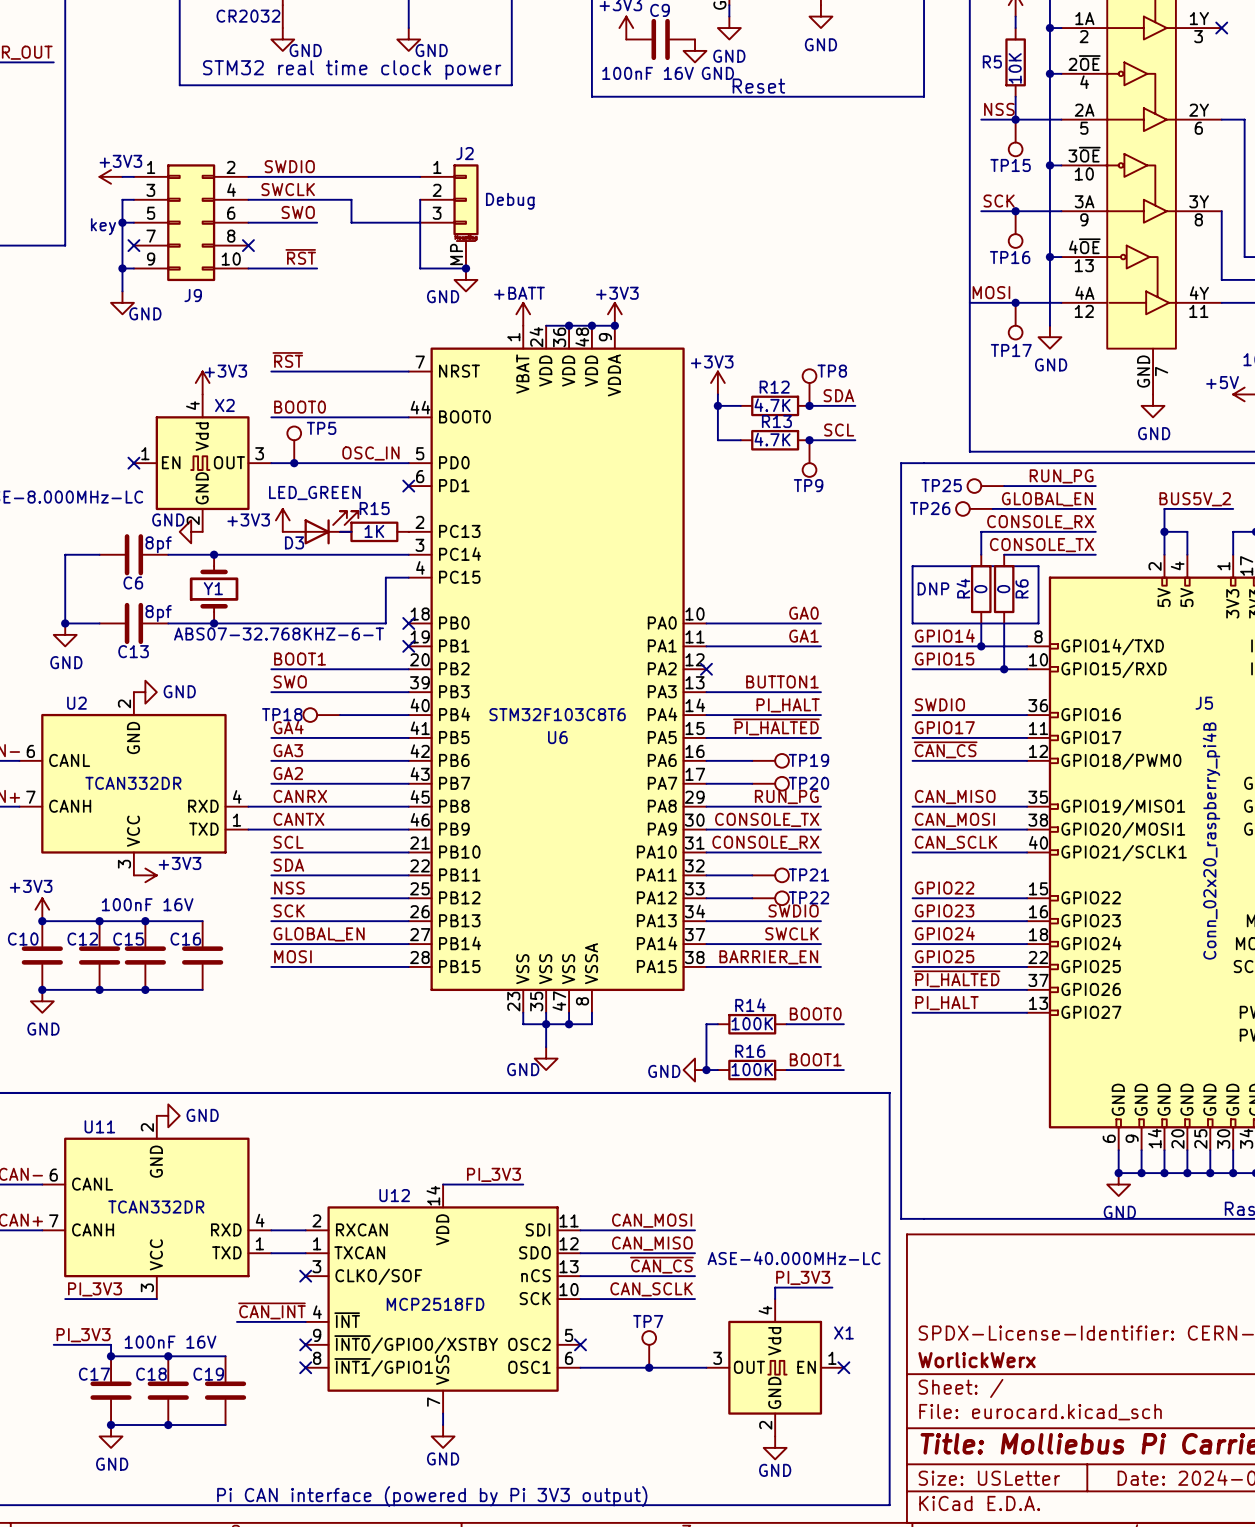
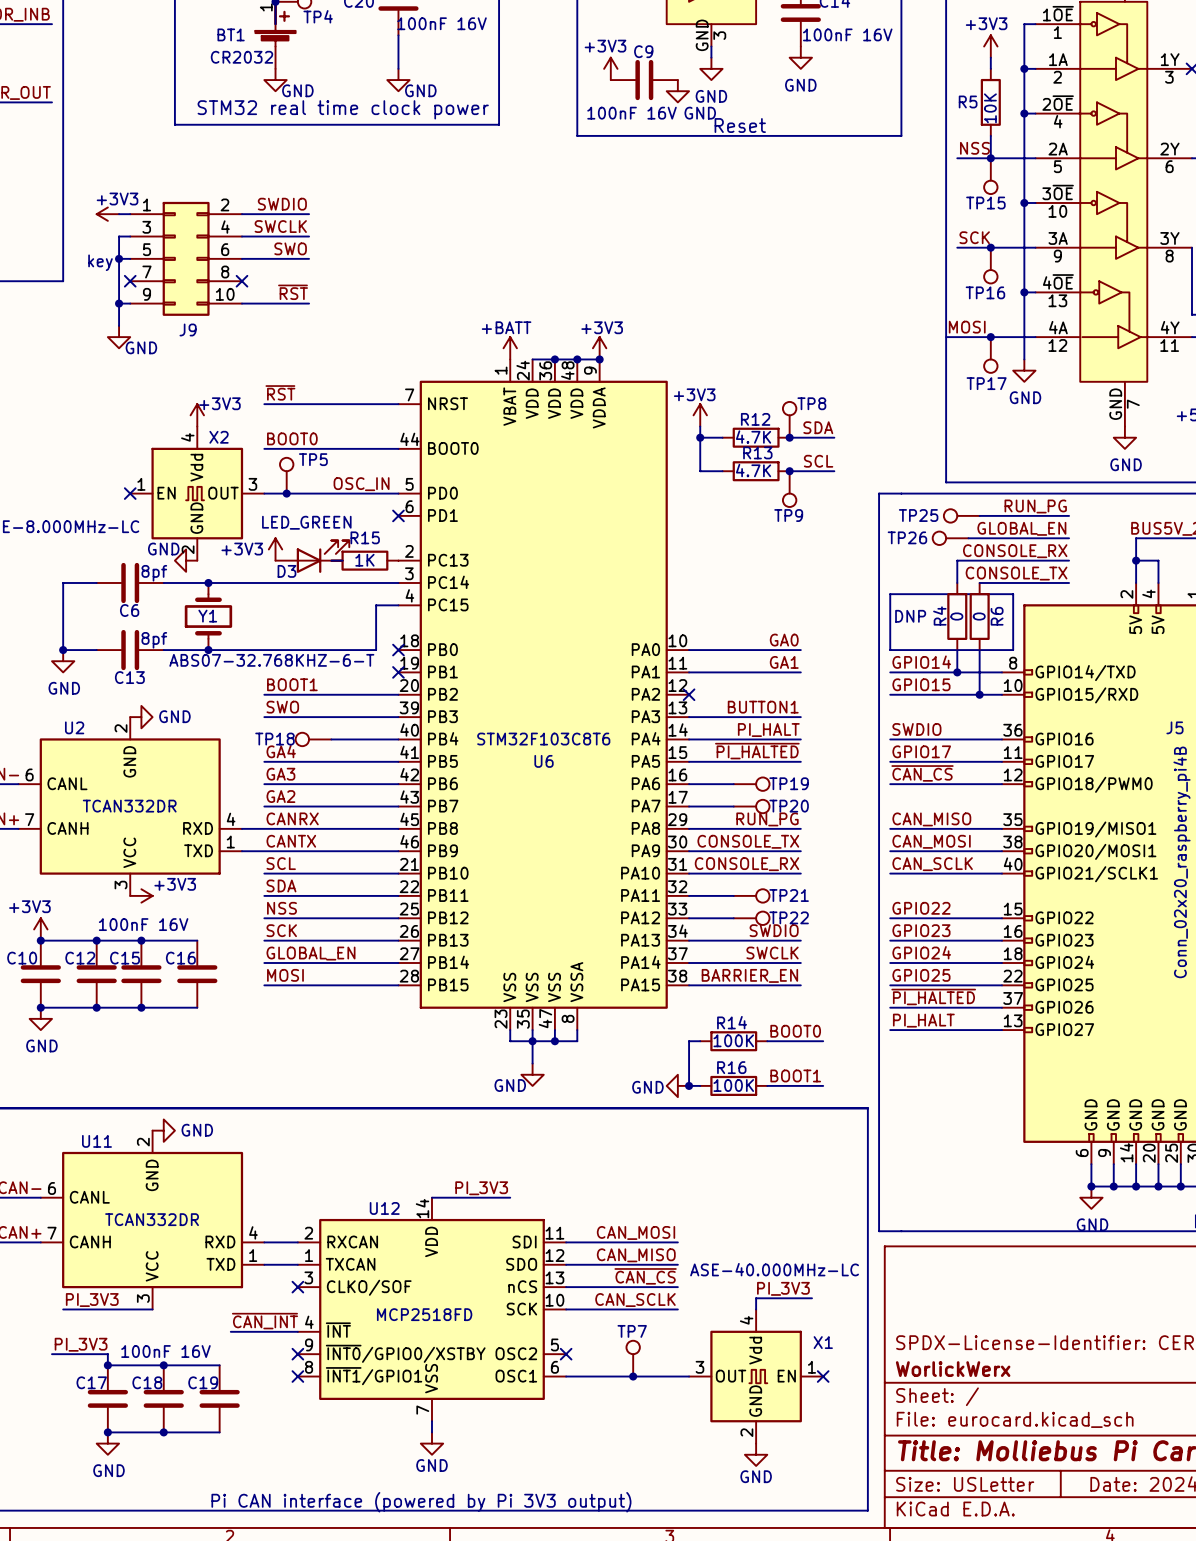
wire: (317, 176) (420, 176) -> none
wire: (317, 199) (351, 199) (351, 222) (420, 222) -> none
wire: (420, 199) (420, 268) (465, 268) -> none
J2: Debug (449, 216) -> none
junction: (465, 268) -> none
power symbol: GND (465, 279) -> none

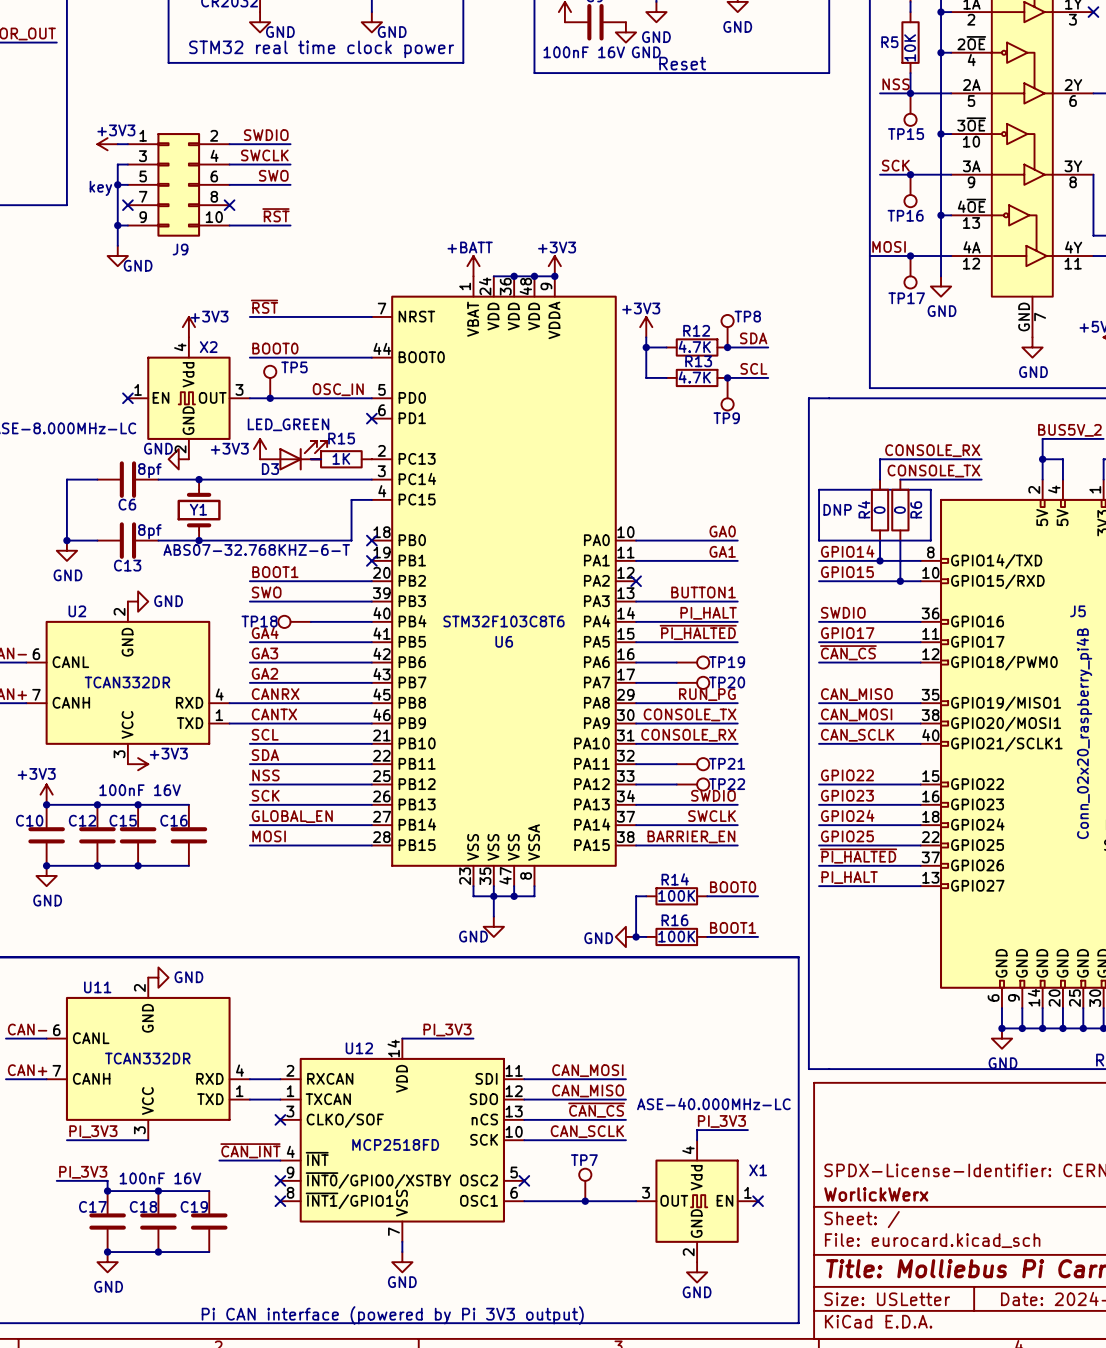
label: RUN_PG (1035, 506) -> none
TP25: (961, 515) -> none
wire: (979, 515) (1069, 515) -> none
label: GLOBAL_EN (1021, 528) -> none
TP26: (950, 538) -> none
wire: (968, 538) (1069, 538) -> none

